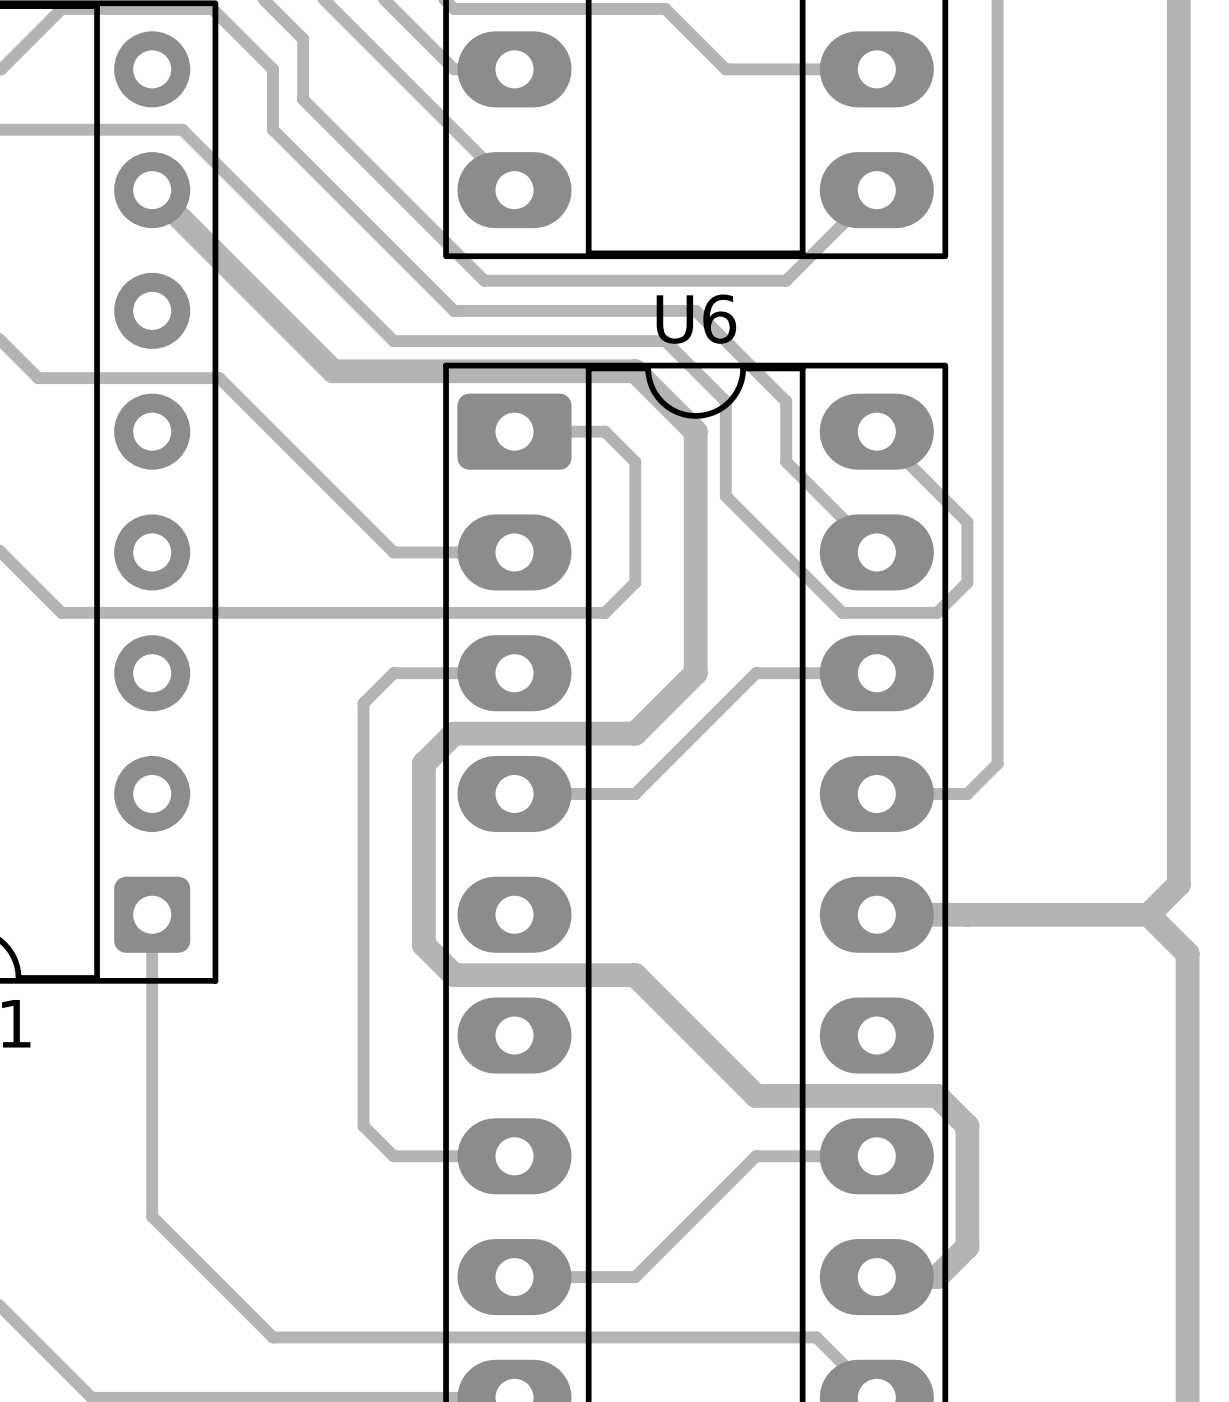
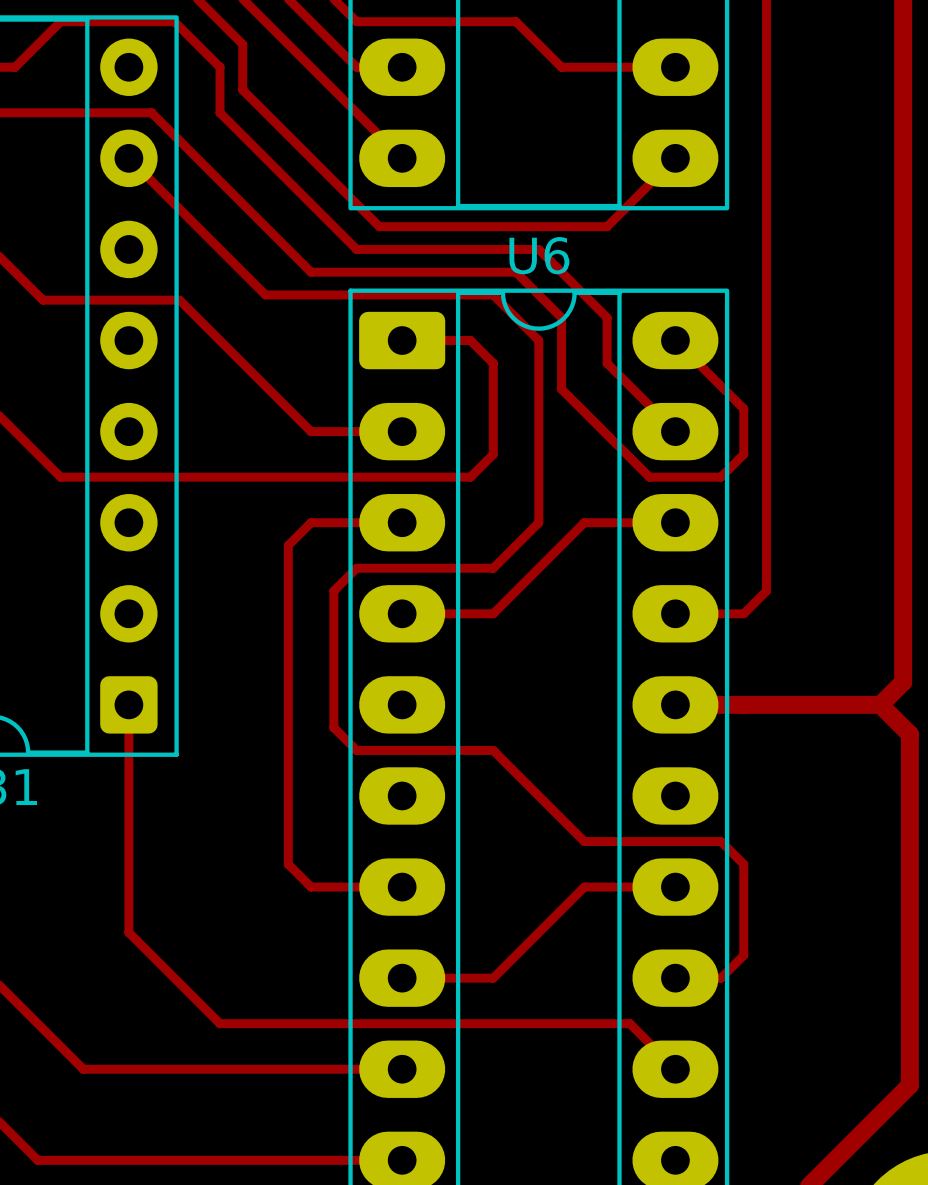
track width: thick (152, 190) (333, 371) (635, 371) (695, 431) (695, 673) (635, 733) (454, 733) (423, 763) (423, 944) (454, 975) (635, 975) (756, 1095) (937, 1095) (967, 1126) (967, 1246) (937, 1277) (876, 1277) -> thin (128, 158) (265, 294) (493, 294) (538, 340) (538, 522) (493, 568) (356, 568) (333, 591) (333, 727) (356, 750) (493, 750) (584, 841) (720, 841) (743, 864) (743, 955) (720, 978) (675, 978)

